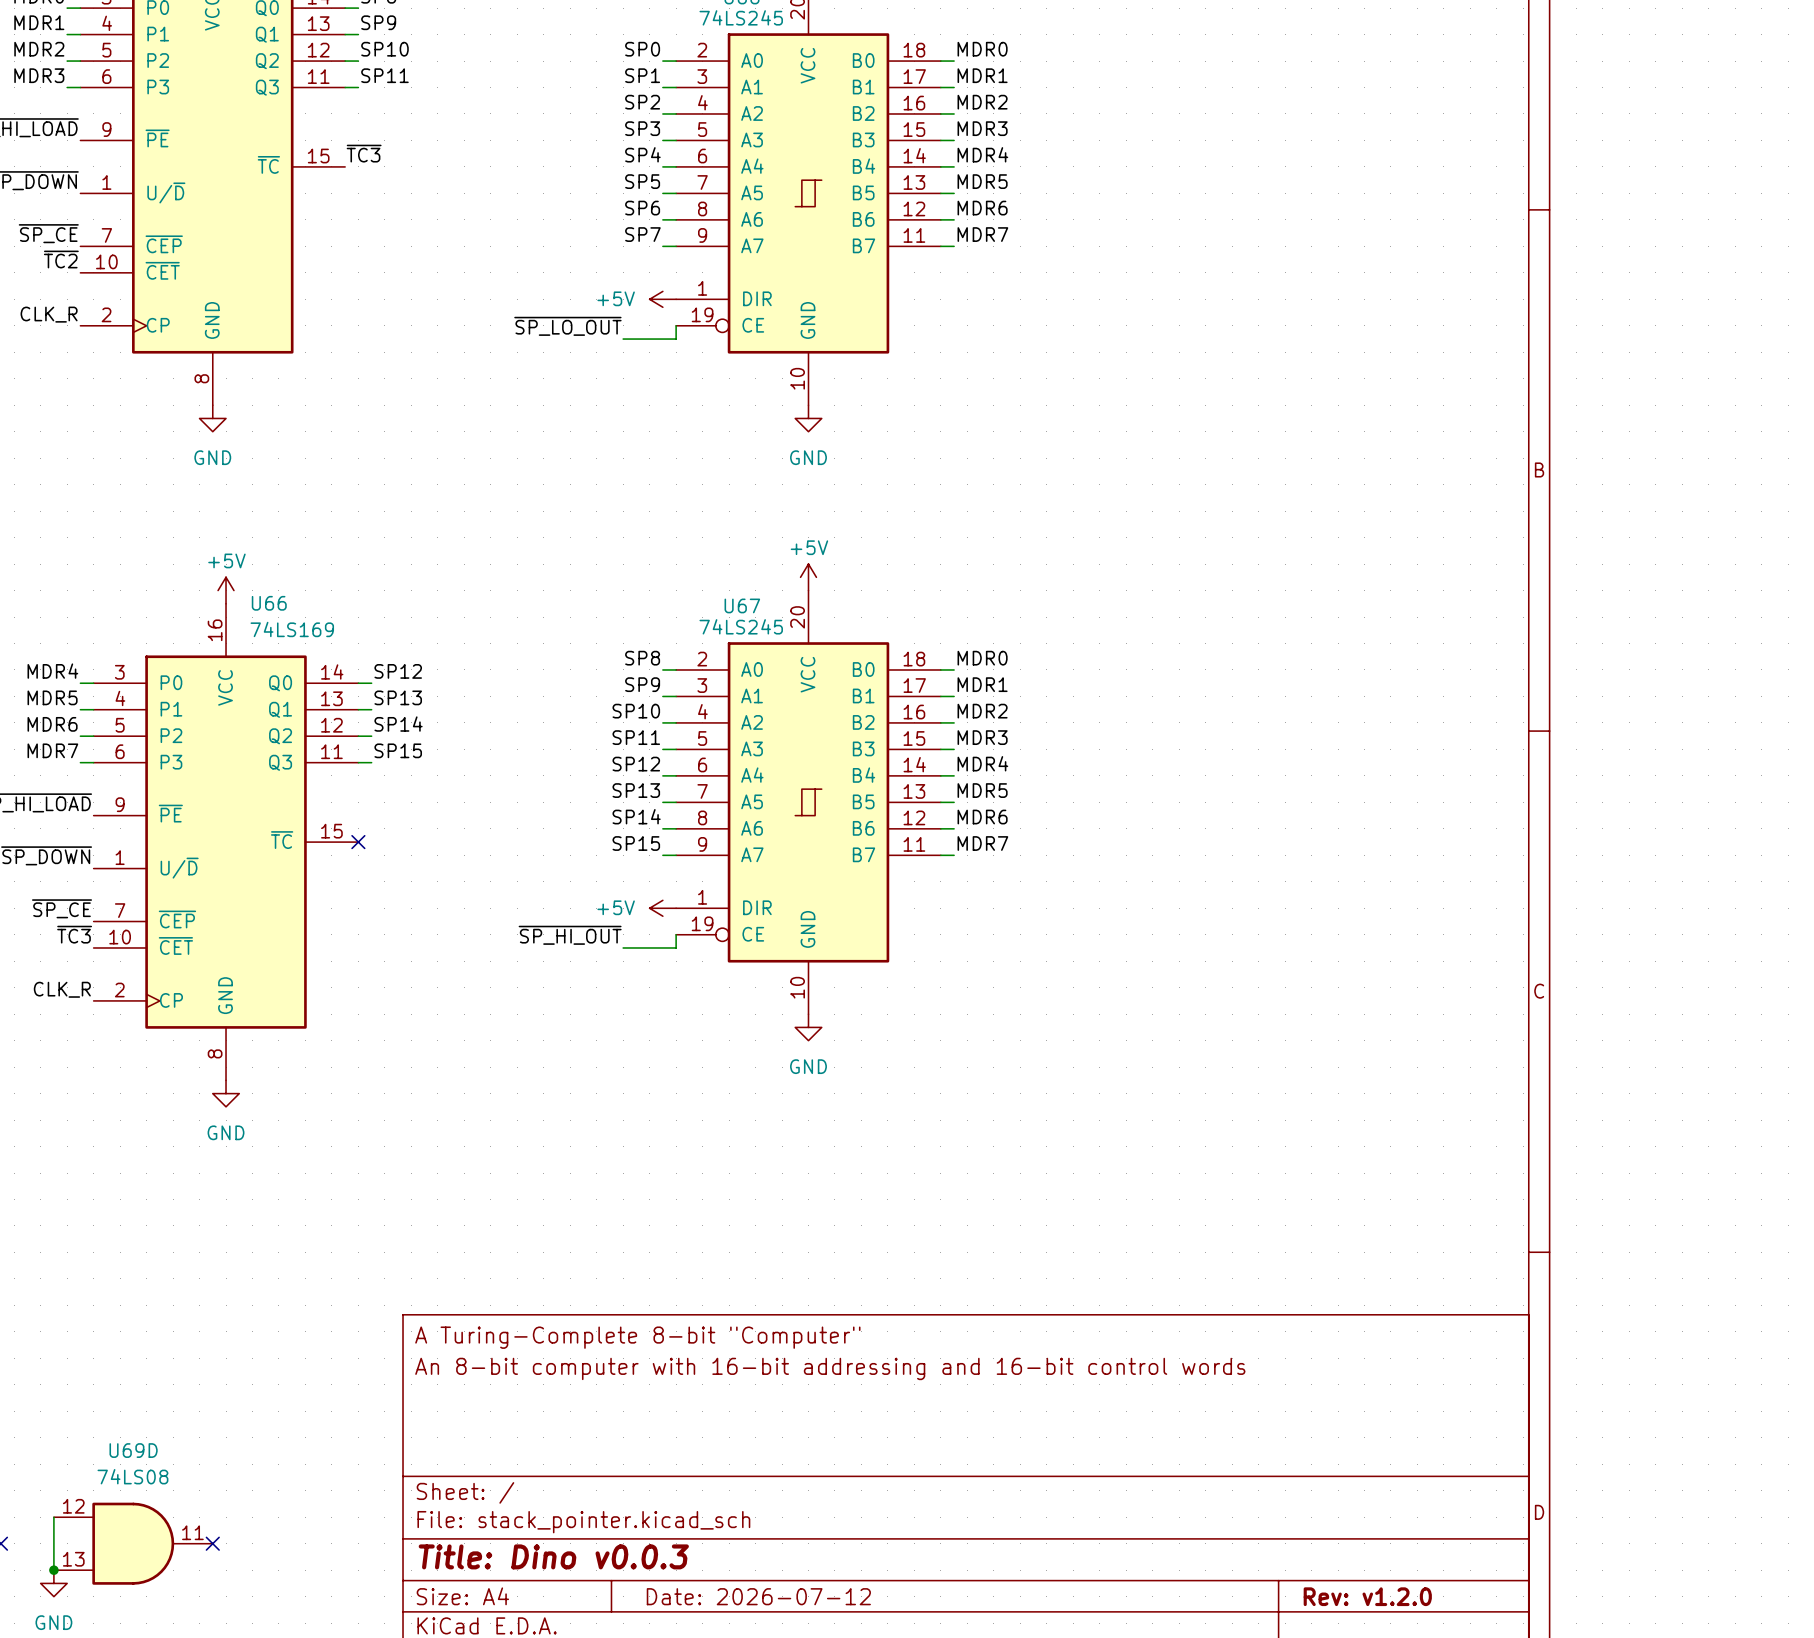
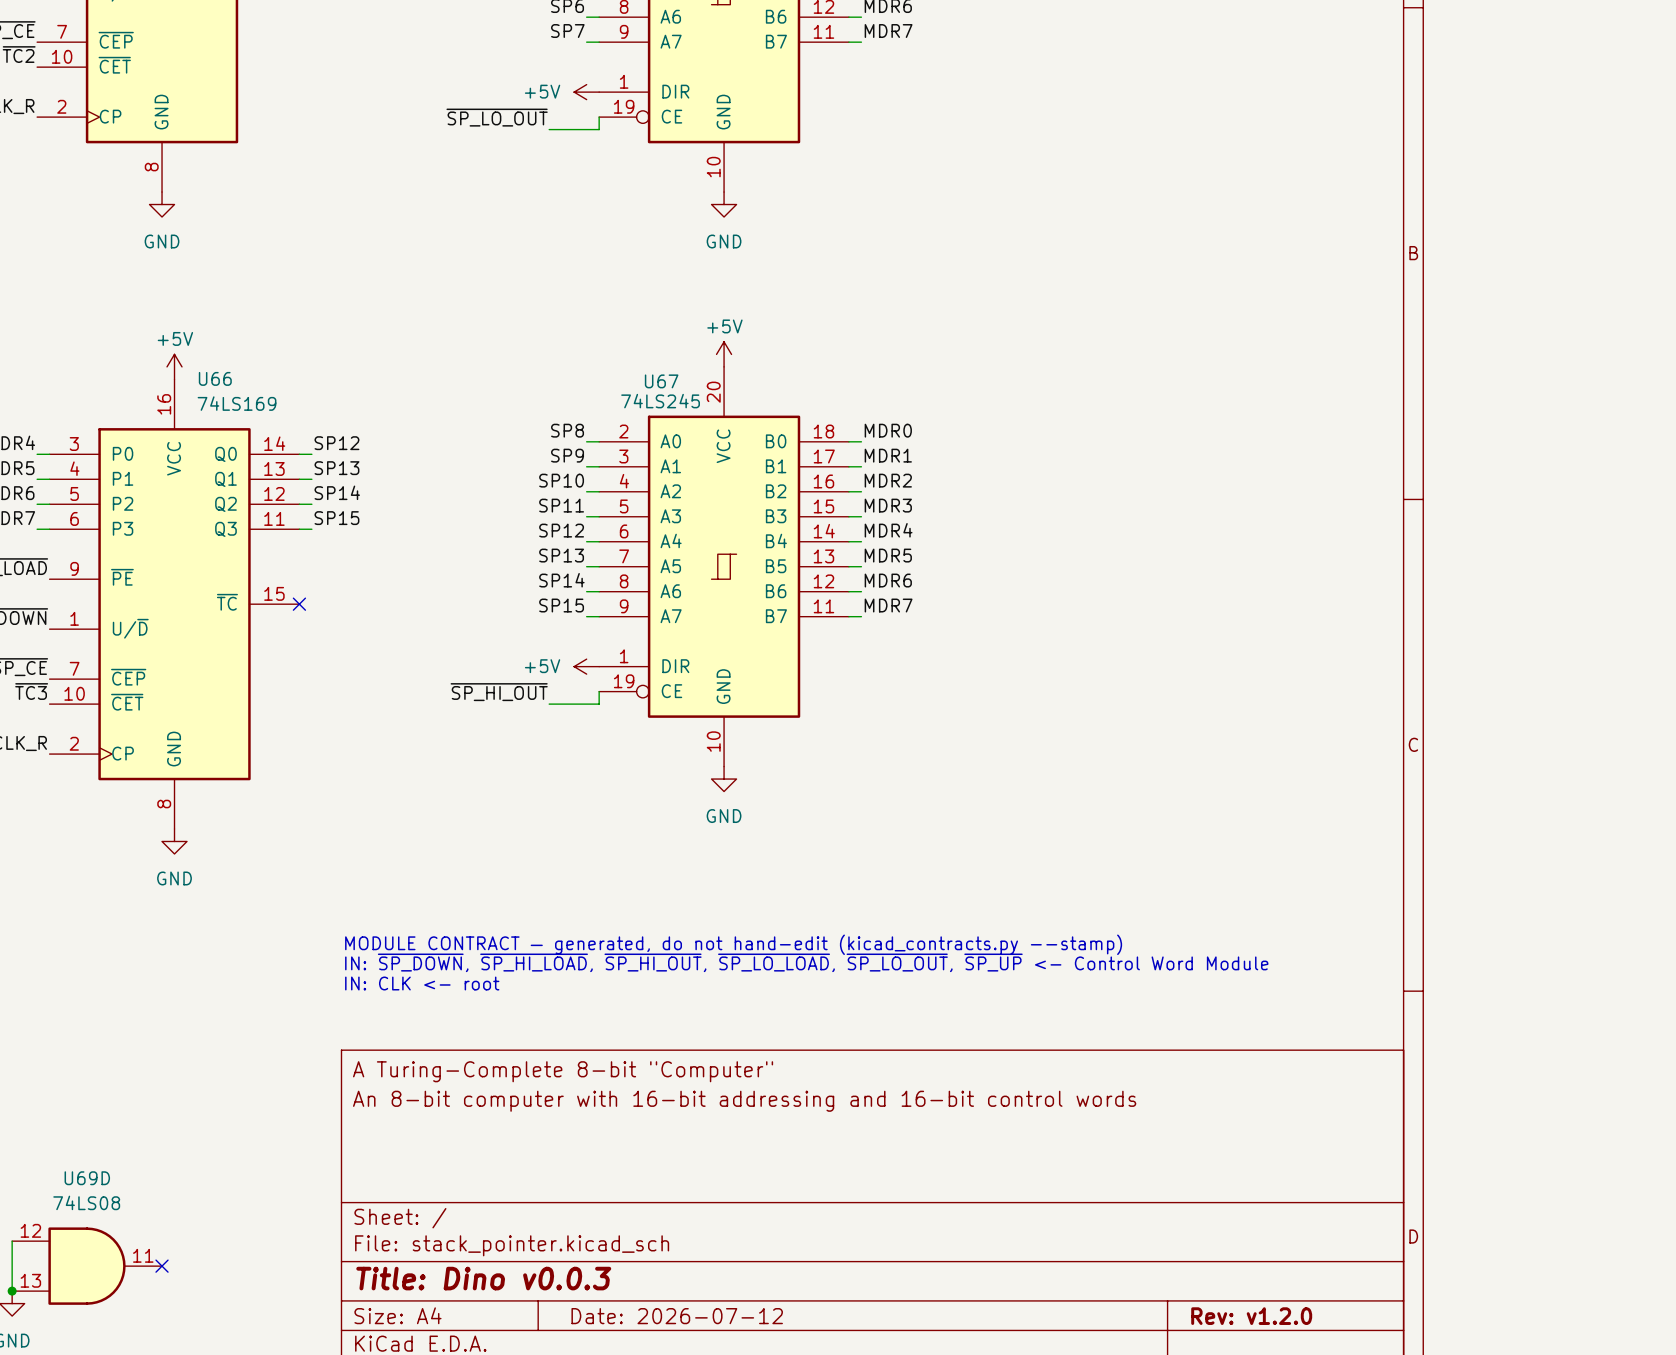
text: none -> MODULE CONTRACT — generated, do not hand-edit (kicad_contracts.py --stamp) (733, 944)
text: none -> IN: ~{SP_DOWN}, ~{SP_HI_LOAD}, ~{SP_HI_OUT}, ~{SP_LO_LOAD}, ~{SP_LO_OUT}, ~{SP_UP} <- Control Word Module (806, 962)
text: none -> IN: CLK <- root (422, 983)

